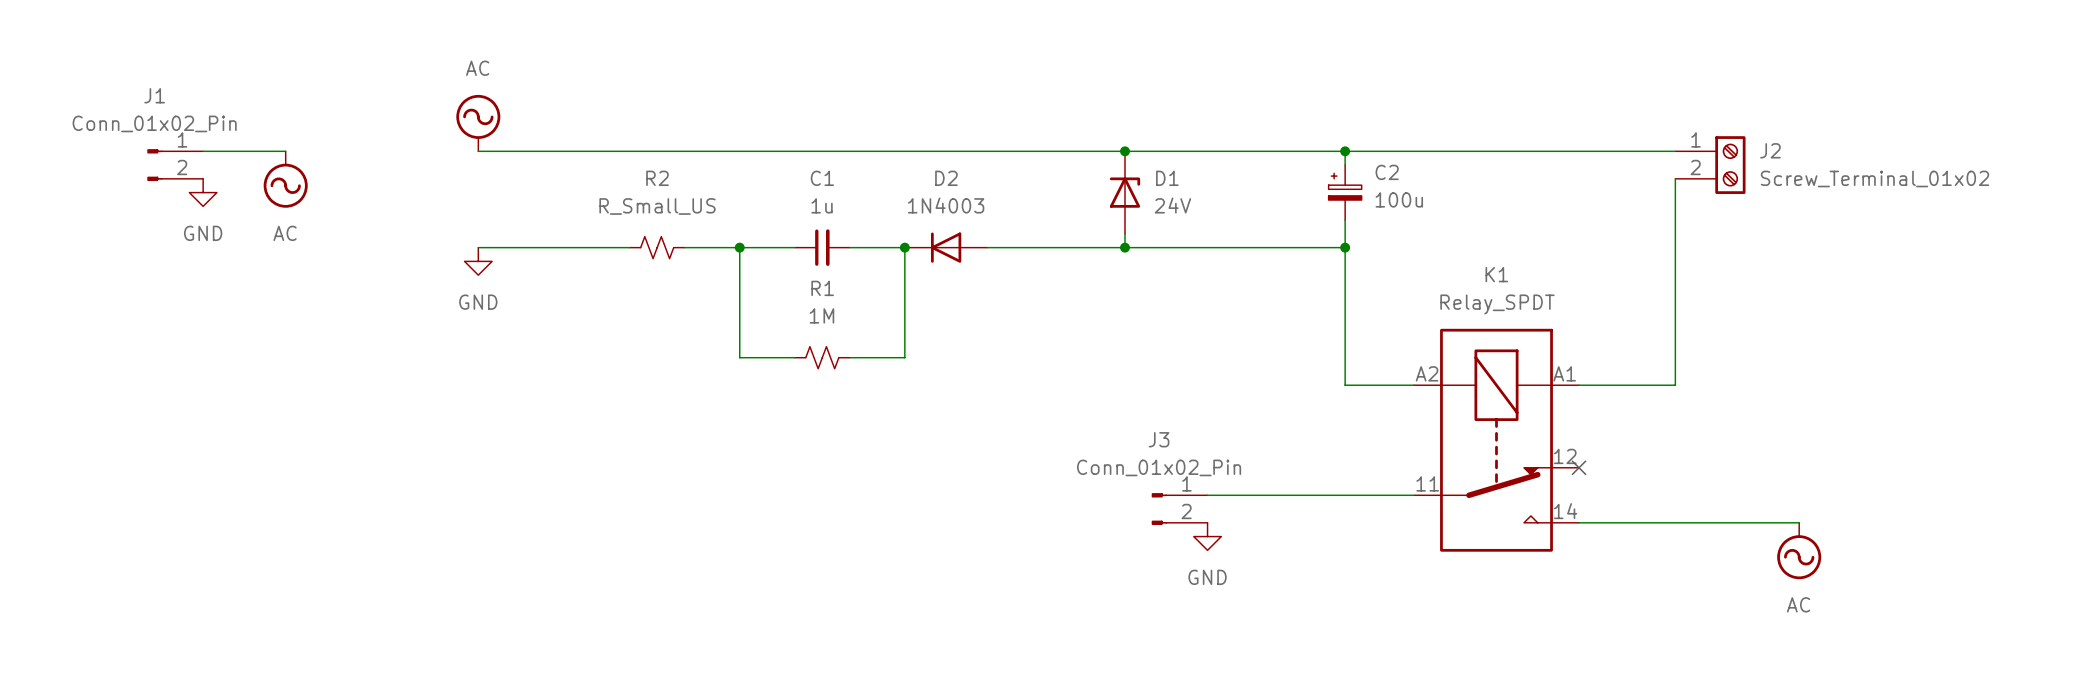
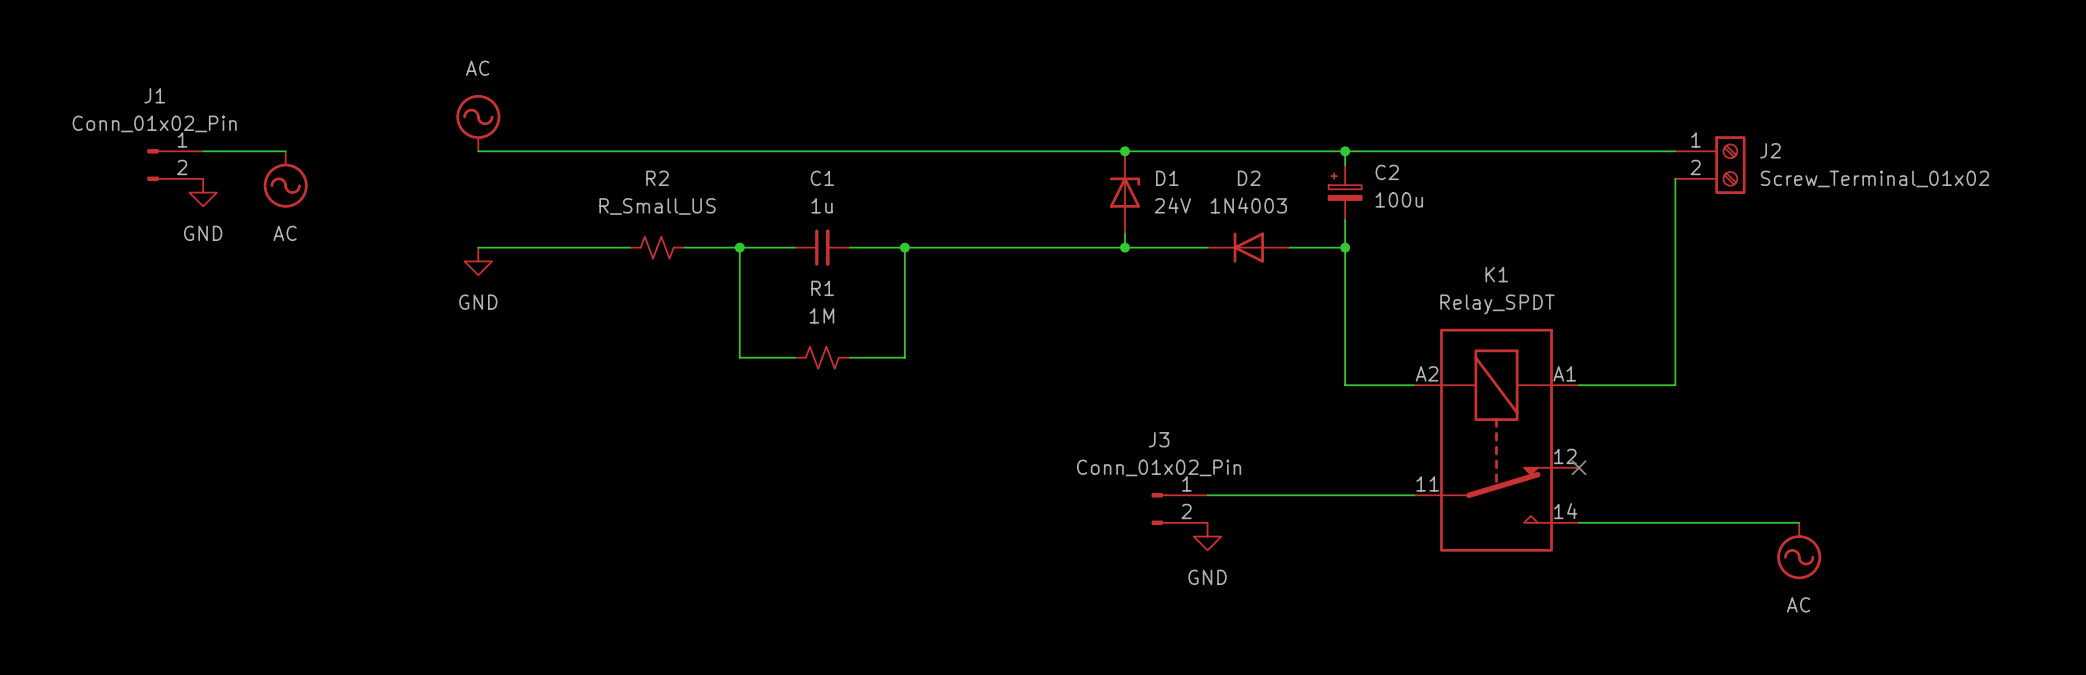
D2 position: (946, 247) -> (1248, 247)

